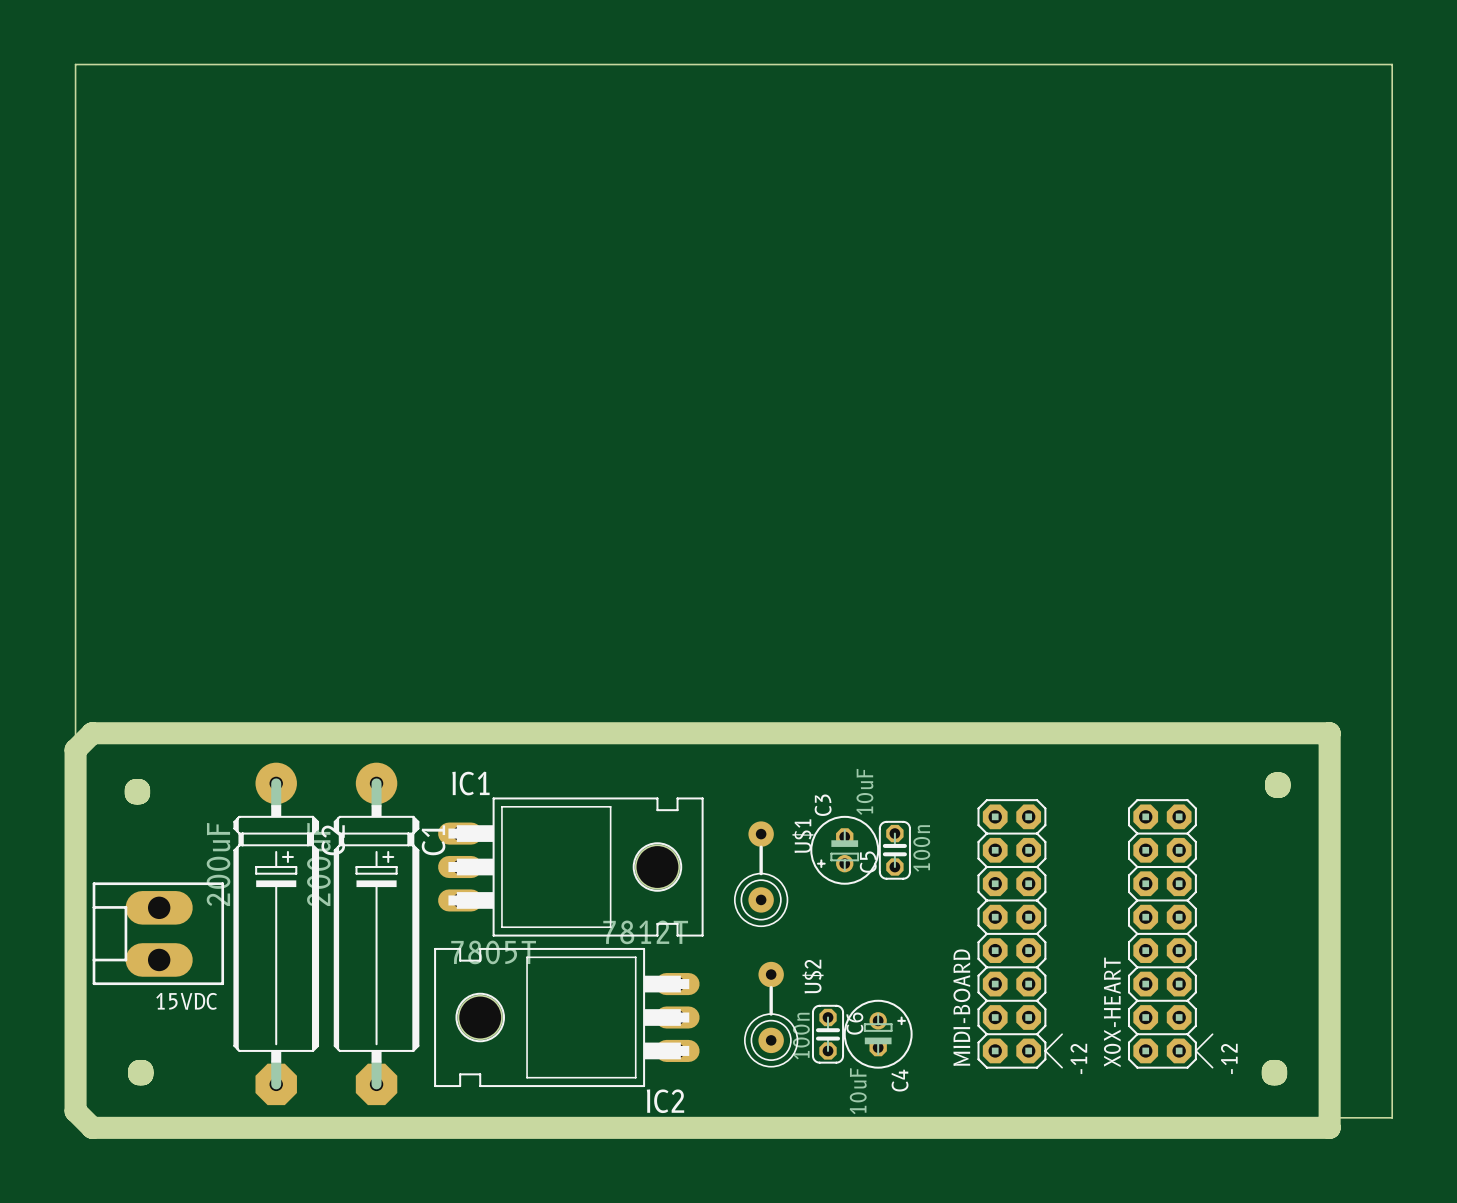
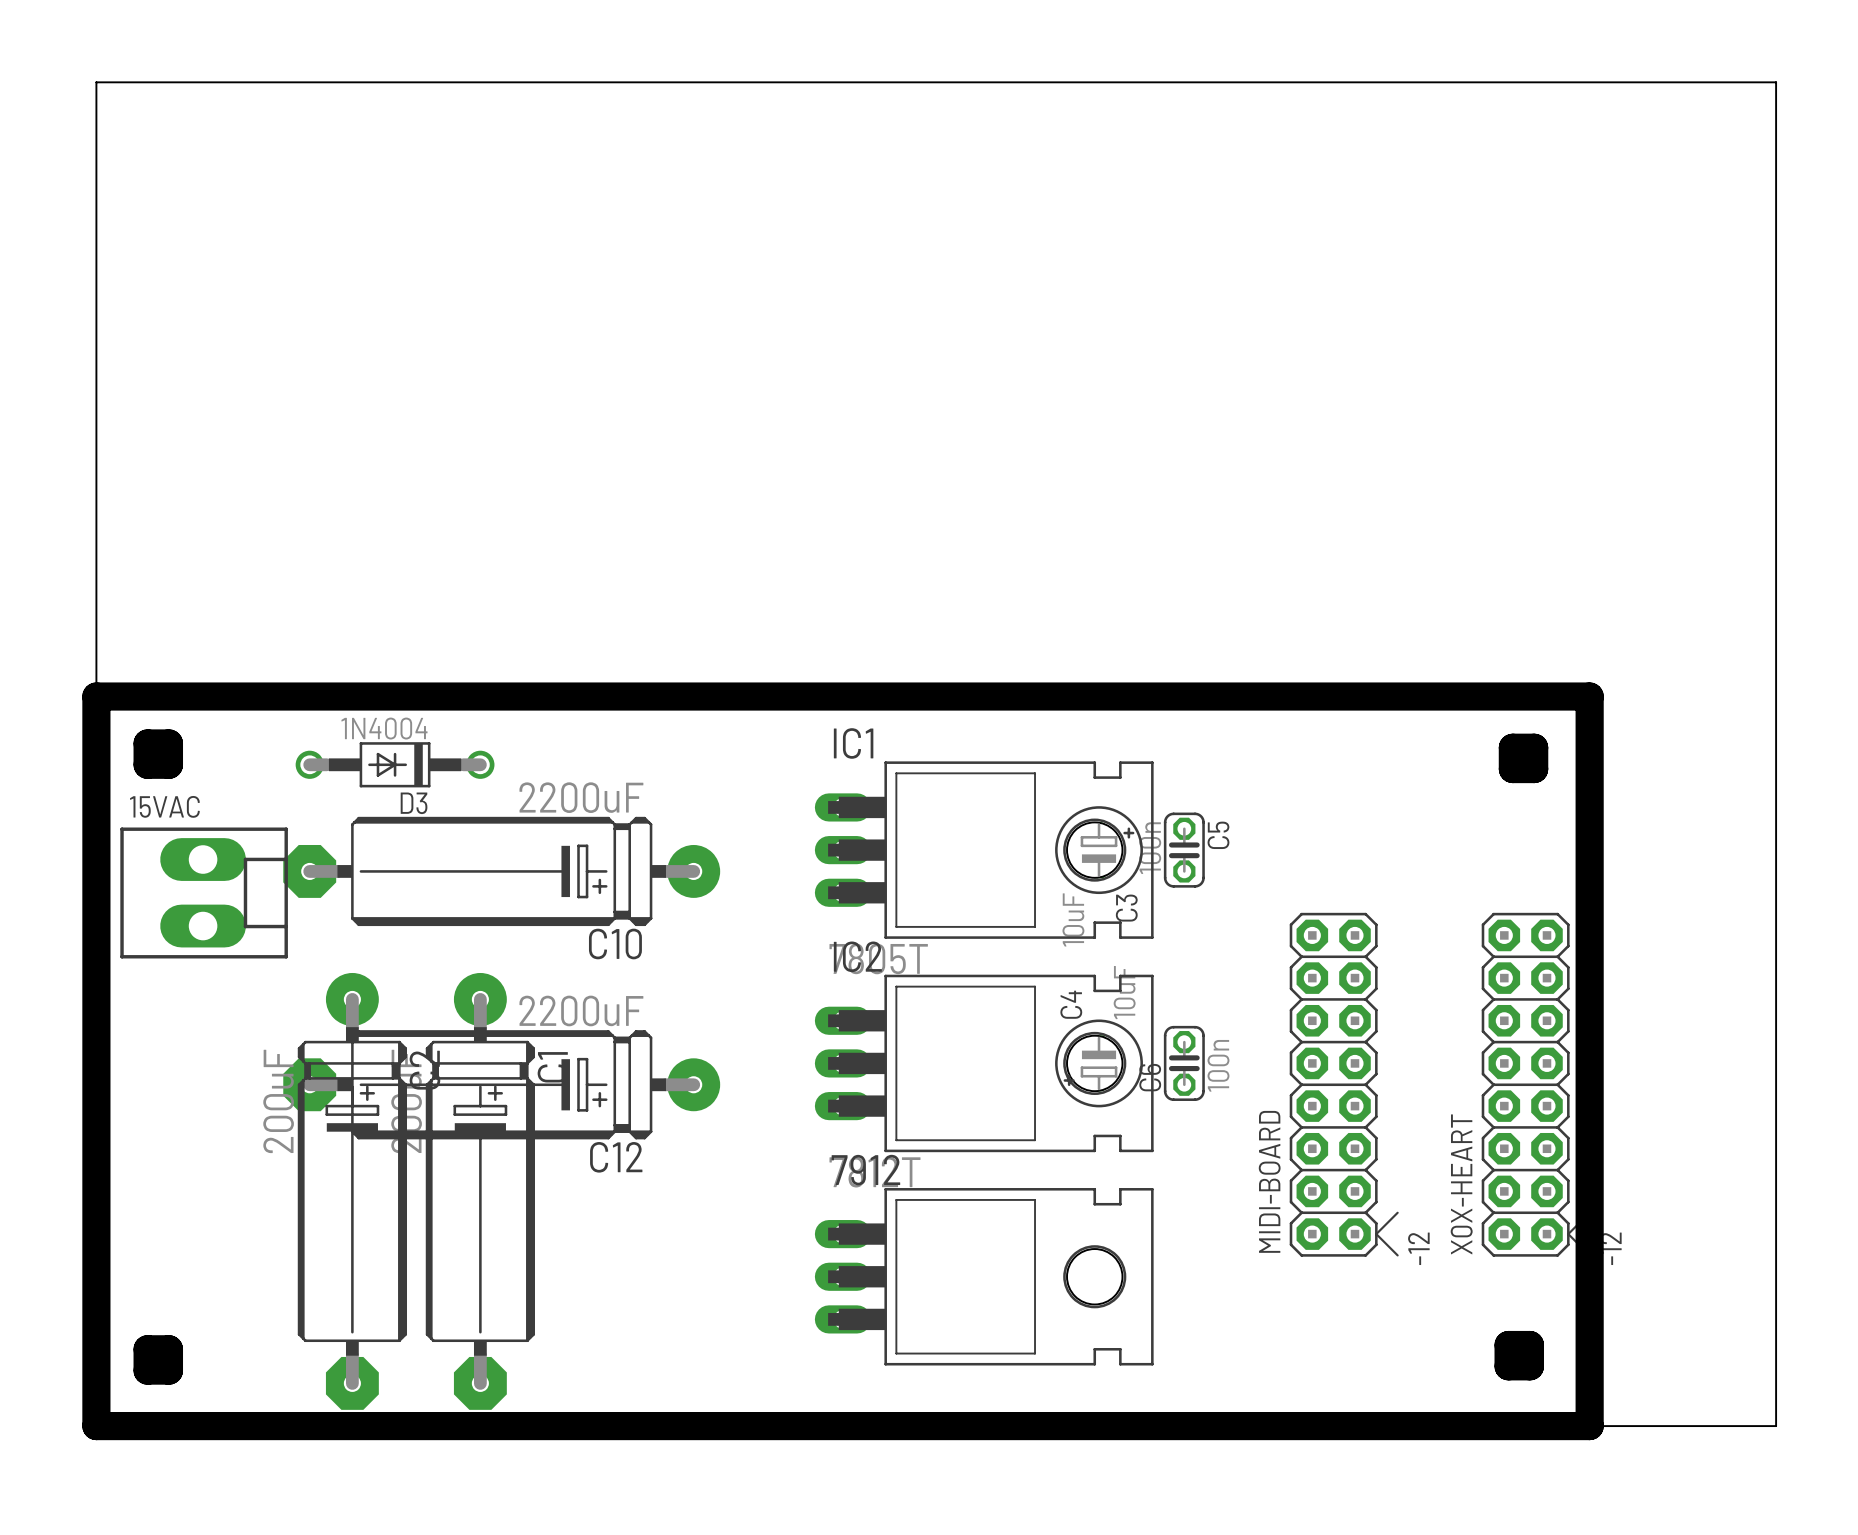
board edge: none -> (147, 743) (168, 743) (168, 764) (147, 764) (147, 743)
board edge: none -> (1512, 747) (1534, 747) (1534, 769) (1512, 769) (1512, 747)
D3: none -> 1N4004 (395, 764)
C10: none -> 2200uF (501, 871)
15VAC: none -> (204, 892)
board edge: (75, 749) (92, 733) (1329, 733) (1329, 1127) (92, 1127) (75, 1111) -> (96, 956) (96, 696) (1589, 696) (1589, 1426) (96, 1426) (96, 1417)
board edge: (1276, 783) (1276, 786) (1279, 786) (1279, 783) (1276, 783) -> none
board edge: (135, 790) (135, 793) (139, 793) (139, 790) (135, 790) -> none
C12: none -> 2200uF (501, 1084)
C3 rotation: 0° (844, 850) -> 180° (1099, 850)
C3 position: (844, 850) -> (1099, 850)
C5 rotation: 0° (894, 850) -> 180° (1184, 850)
C5 position: (894, 850) -> (1184, 850)
IC1 position: (570, 867) -> (984, 850)
U$1: (761, 874) -> none
15VDC: (158, 933) -> none
MIDI-BOARD position: (1020, 933) -> (1344, 1084)
X0X-HEART position: (1170, 933) -> (1536, 1084)
7912: none -> (984, 1276)
U$2: (771, 1014) -> none
IC2 rotation: 0° (566, 1017) -> 180° (984, 1063)
IC2 position: (566, 1017) -> (984, 1063)
C6 rotation: 0° (828, 1034) -> 180° (1184, 1063)
C6 position: (828, 1034) -> (1184, 1063)
C4 rotation: 0° (878, 1034) -> 180° (1099, 1063)
C4 position: (878, 1034) -> (1099, 1063)
board edge: none -> (1508, 1345) (1529, 1345) (1529, 1366) (1508, 1366) (1508, 1345)
board edge: none -> (147, 1349) (147, 1370) (168, 1370) (168, 1349) (147, 1349)
board edge: (139, 1071) (142, 1071) (142, 1074) (139, 1074) (139, 1071) -> none
board edge: (1272, 1071) (1272, 1074) (1276, 1074) (1276, 1071) (1272, 1071) -> none

